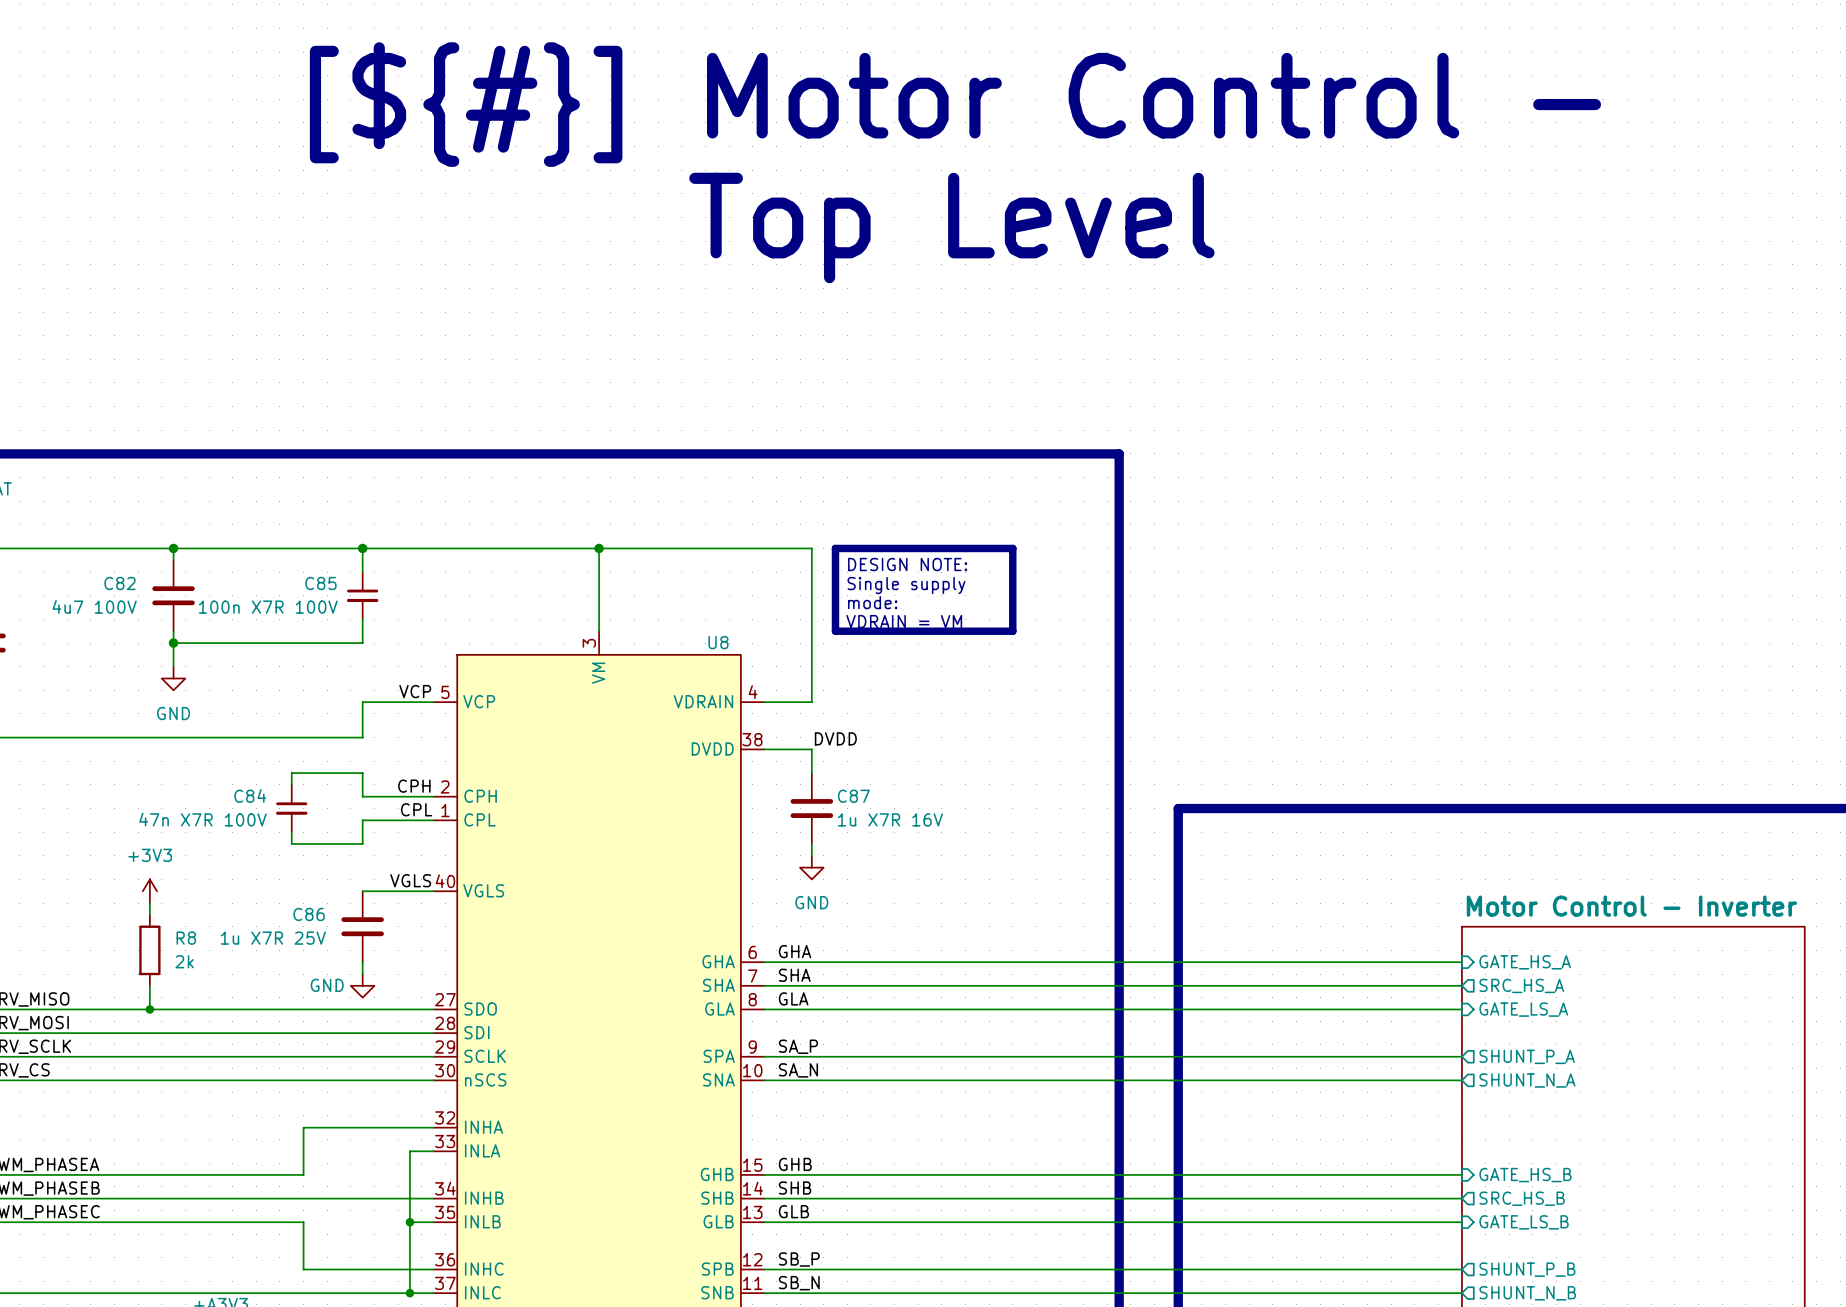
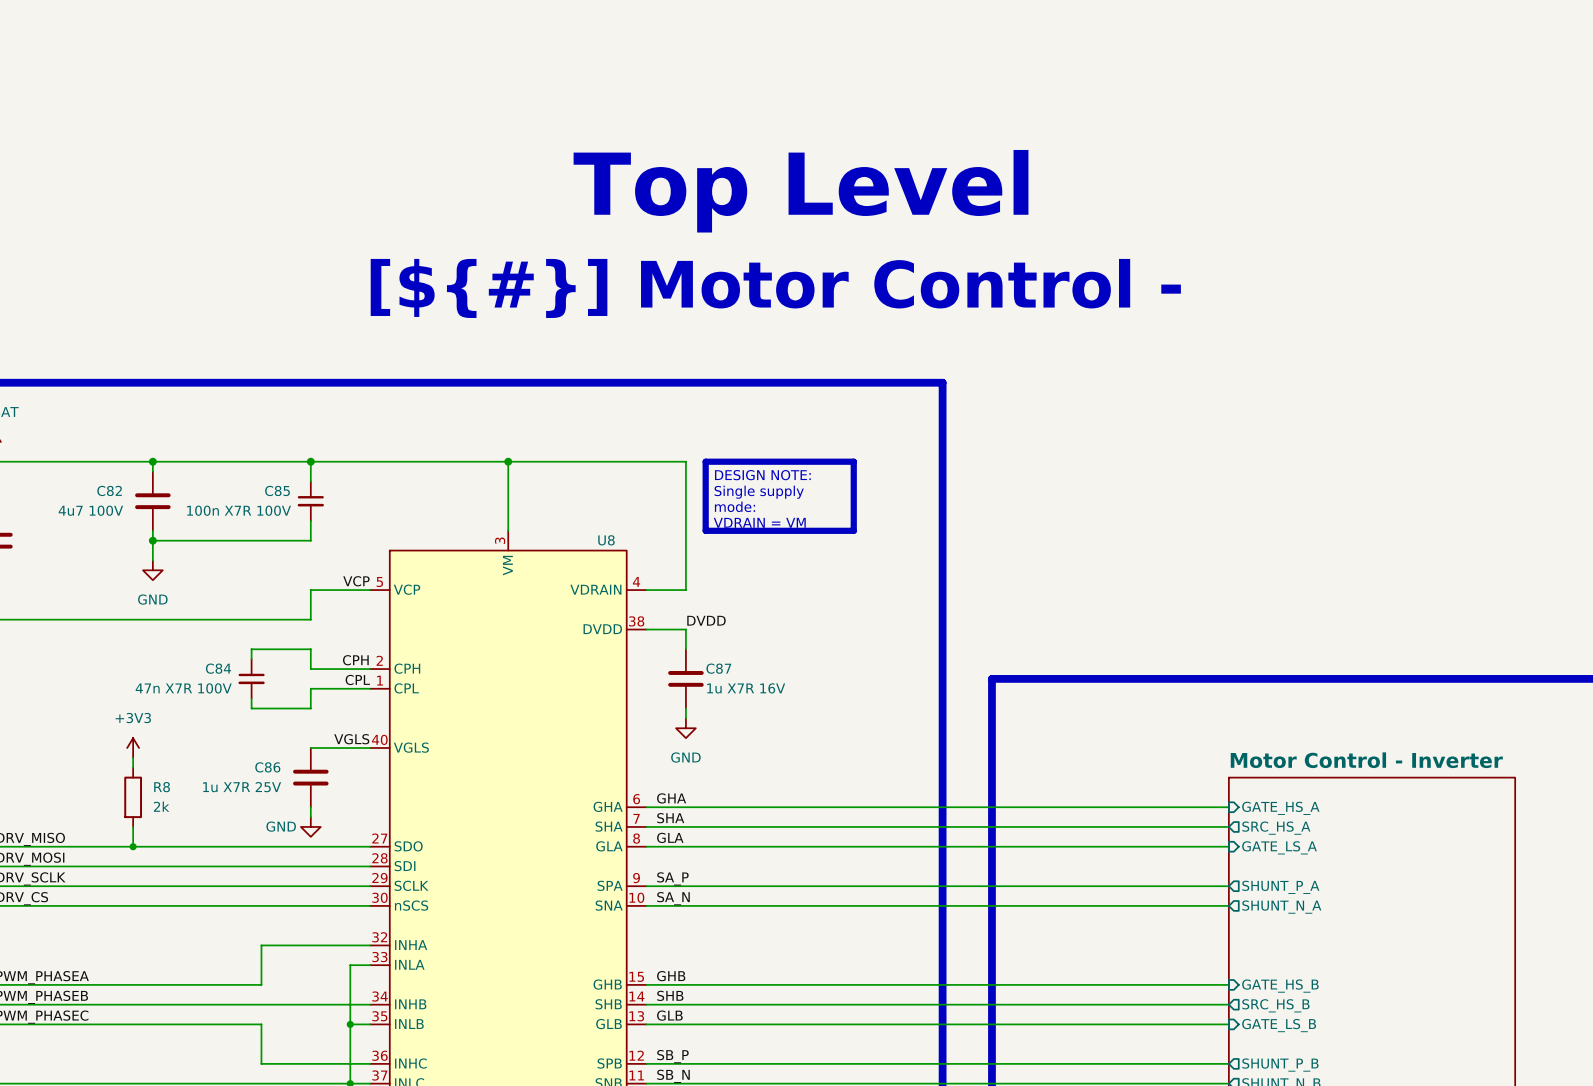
text: [${#}] Motor Control - (955, 104) -> none
text: none -> [${#}] Motor Control - (775, 288)

